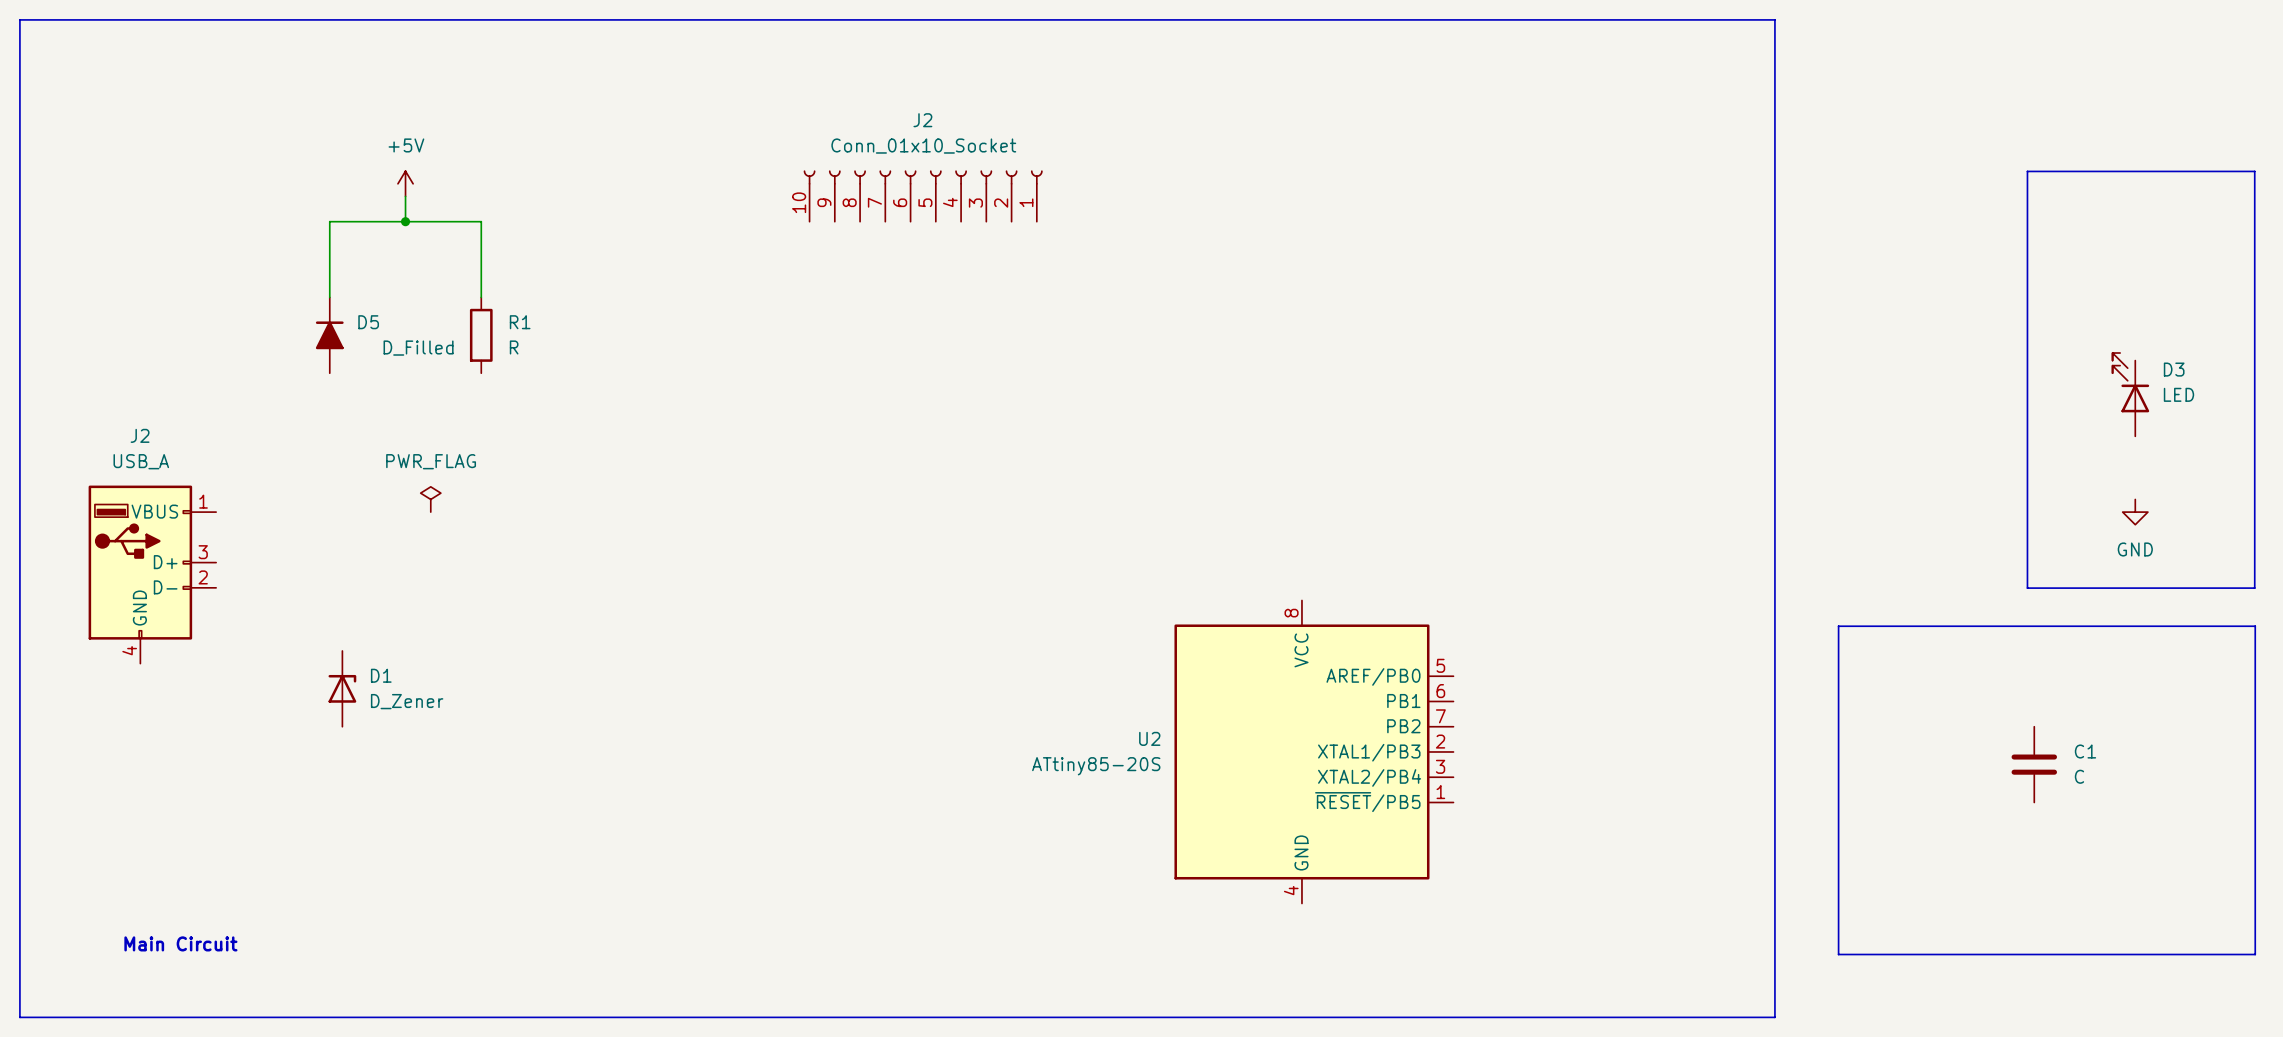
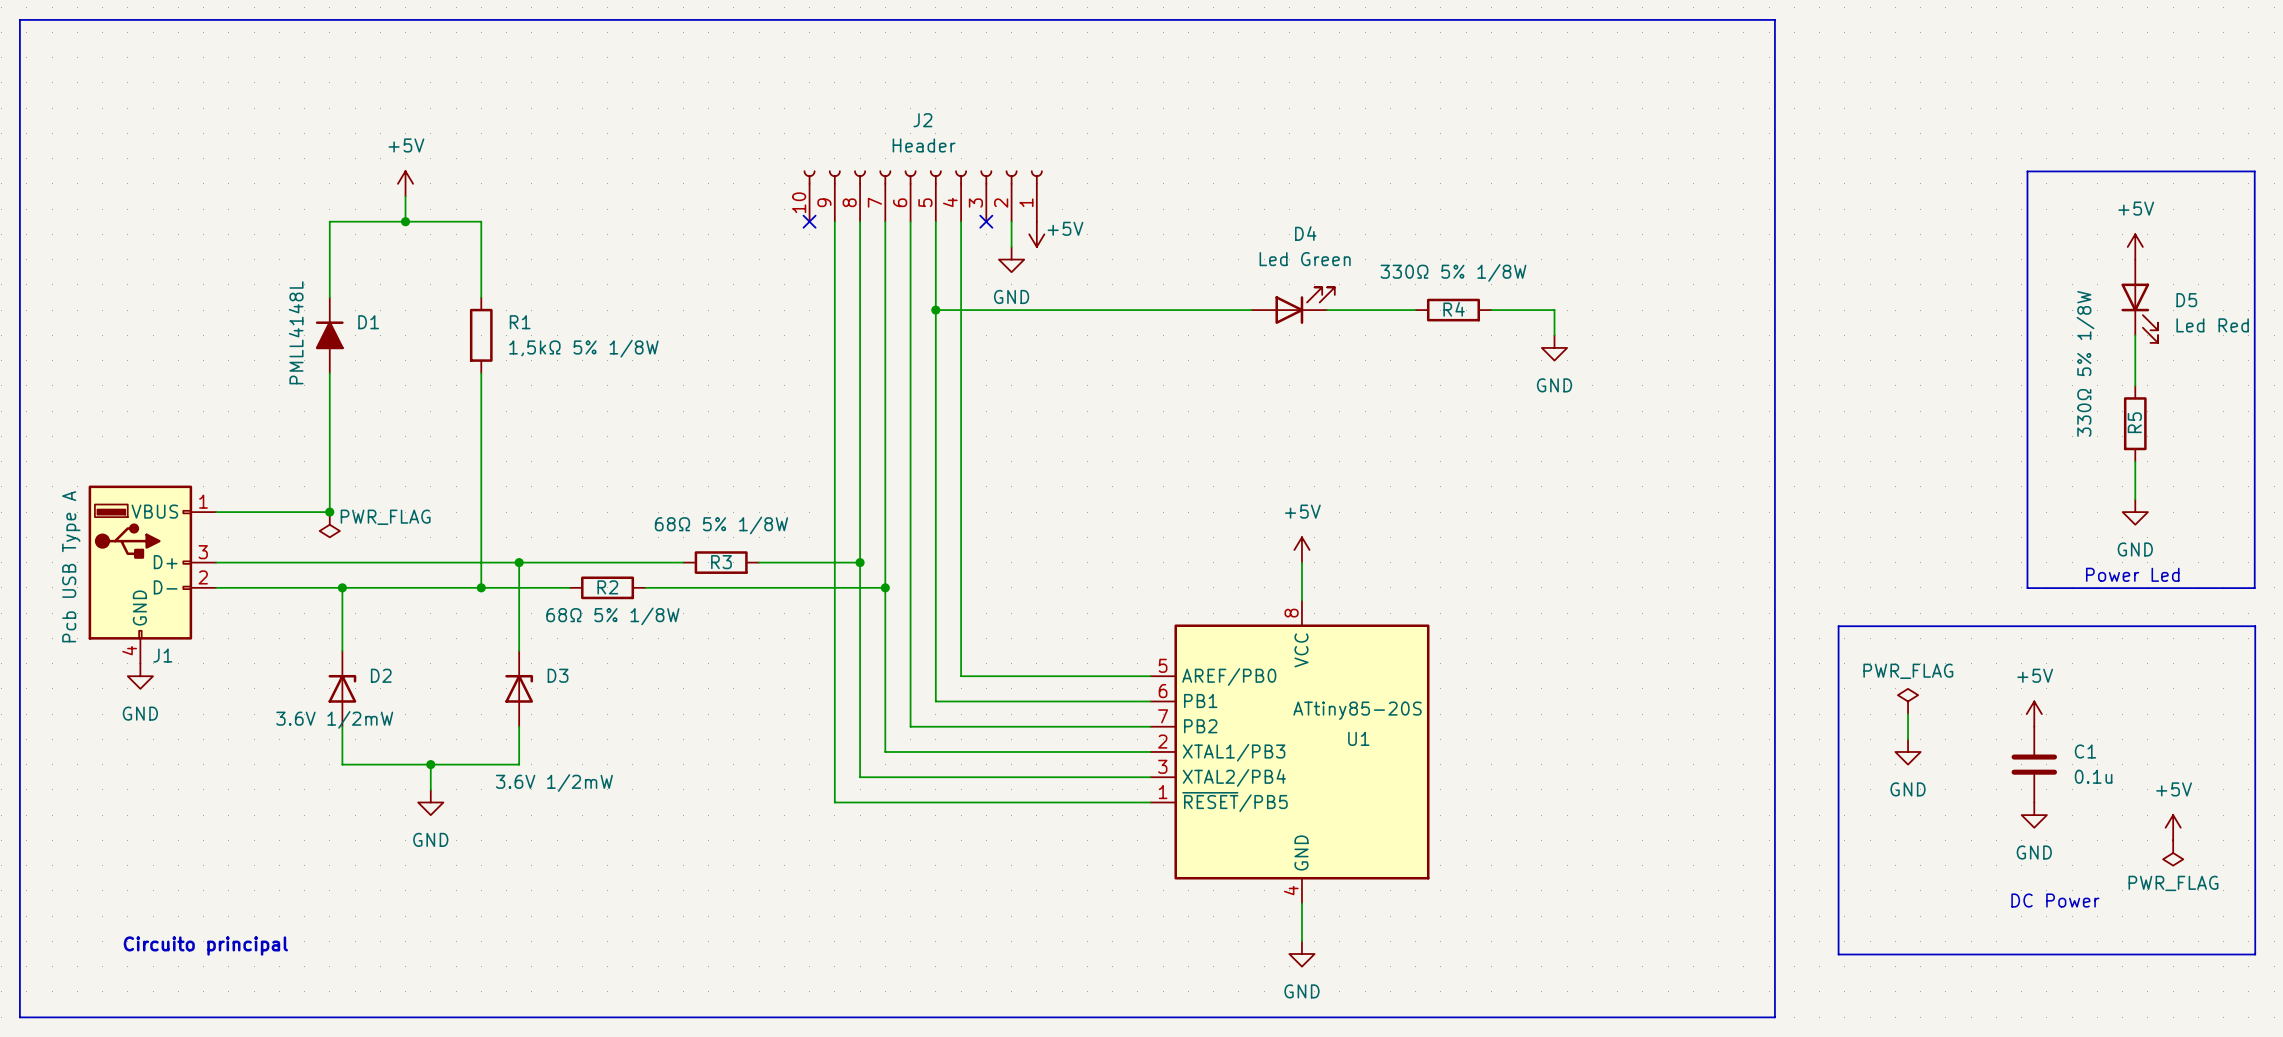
J2 value: Conn_01x10_Socket (923, 146) -> Header (924, 145)
no-connect mark: none -> (809, 221)
wire: none -> (834, 221) (834, 802) (1150, 802)
wire: none -> (860, 221) (860, 777) (1150, 777)
wire: none -> (885, 221) (885, 751) (1150, 751)
wire: none -> (910, 221) (910, 726) (1150, 726)
wire: none -> (935, 221) (935, 701) (1150, 701)
wire: none -> (961, 221) (961, 676) (1150, 676)
no-connect mark: none -> (986, 221)
wire: none -> (1011, 221) (1011, 246)
power symbol: none -> +5V (1036, 234)
power symbol: none -> +5V (2135, 246)
power symbol: none -> GND (1011, 259)
D5: none -> Led Red (2139, 301)
D4: none -> Led Green (1293, 305)
wire: none -> (935, 310) (1251, 310)
junction: none -> (935, 310)
wire: none -> (1327, 310) (1415, 310)
R4: none -> 330Ω 5% 1/8W (1453, 310)
wire: none -> (1491, 310) (1554, 310) (1554, 335)
D5 name: D5 (368, 322) -> D1 (368, 322)
wire: none -> (2135, 335) (2135, 385)
R1 value: R (514, 347) -> 1,5kΩ 5% 1/8W (583, 348)
power symbol: none -> GND (1554, 347)
D5 value: D_Filled (418, 348) -> PMLL4148L (296, 332)
D3 symbol: [2112, 353, 2150, 437] -> [505, 650, 534, 727]
wire: none -> (329, 373) (329, 512) (216, 512)
wire: none -> (481, 373) (481, 587)
D3 value: LED (2178, 394) -> 3.6V 1/2mW (554, 783)
R5: none -> 330Ω 5% 1/8W (2135, 423)
J2 name: J2 (140, 435) -> J1 (162, 655)
J2 value: USB_A (141, 461) -> Pcb USB Type A (71, 566)
power symbol text position: PWR_FLAG (431, 461) -> PWR_FLAG (385, 517)
wire: none -> (2135, 461) (2135, 499)
power symbol rotation: 0° (430, 499) -> 180° (329, 524)
power symbol position: PWR_FLAG (430, 499) -> PWR_FLAG (329, 524)
junction: none -> (329, 512)
power symbol: none -> +5V (1301, 549)
wire: none -> (216, 562) (683, 562)
wire: none -> (519, 562) (519, 650)
junction: none -> (519, 562)
R3: none -> 68Ω 5% 1/8W (721, 562)
wire: none -> (759, 562) (860, 562)
junction: none -> (860, 562)
wire: none -> (1301, 562) (1301, 600)
text: none -> Power Led (2132, 574)
wire: none -> (216, 587) (569, 587)
wire: none -> (342, 587) (342, 650)
junction: none -> (342, 587)
junction: none -> (481, 587)
R2: none -> 68Ω 5% 1/8W (607, 587)
wire: none -> (645, 587) (885, 587)
junction: none -> (885, 587)
D1 name: D1 (381, 675) -> D2 (381, 675)
power symbol: none -> GND (140, 676)
D1 value: D_Zener (407, 701) -> 3.6V 1/2mW (334, 719)
power symbol: none -> PWR_FLAG (1908, 701)
wire: none -> (1908, 714) (1908, 739)
power symbol: none -> +5V (2034, 714)
wire: none -> (342, 726) (342, 764) (519, 764) (519, 726)
U1: none -> ATtiny85-20S (1289, 751)
U2: ATtiny85-20S (1313, 751) -> none
power symbol: none -> GND (1908, 751)
wire: none -> (430, 764) (430, 789)
junction: none -> (430, 764)
C1 value: C (2079, 776) -> 0.1u (2093, 776)
power symbol: none -> GND (430, 802)
power symbol: none -> GND (2034, 815)
power symbol: none -> +5V (2173, 827)
power symbol: none -> PWR_FLAG (2173, 852)
text: none -> DC Power (2055, 900)
wire: none -> (1301, 903) (1301, 941)
text: Main Circuit (180, 943) -> Circuito principal (205, 946)
power symbol: none -> GND (1301, 954)

